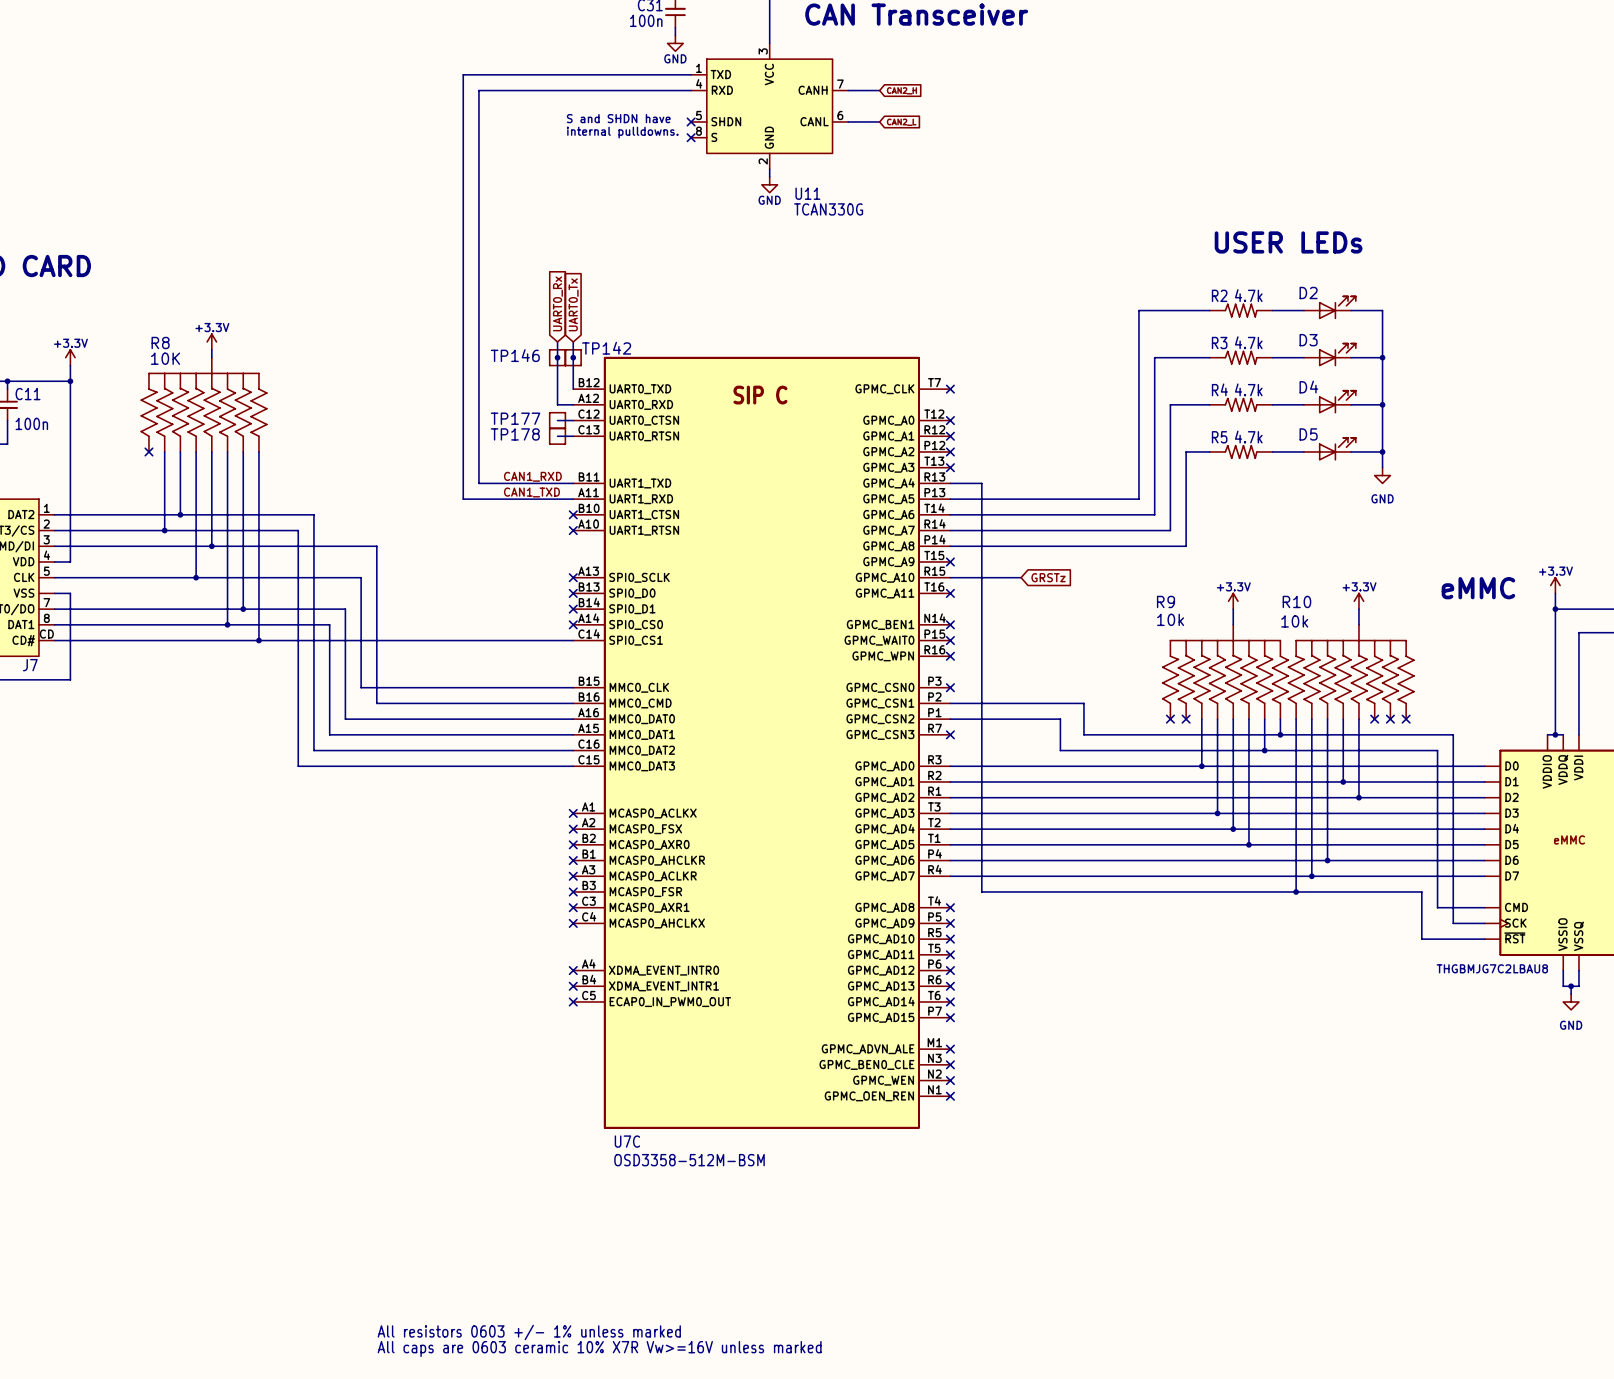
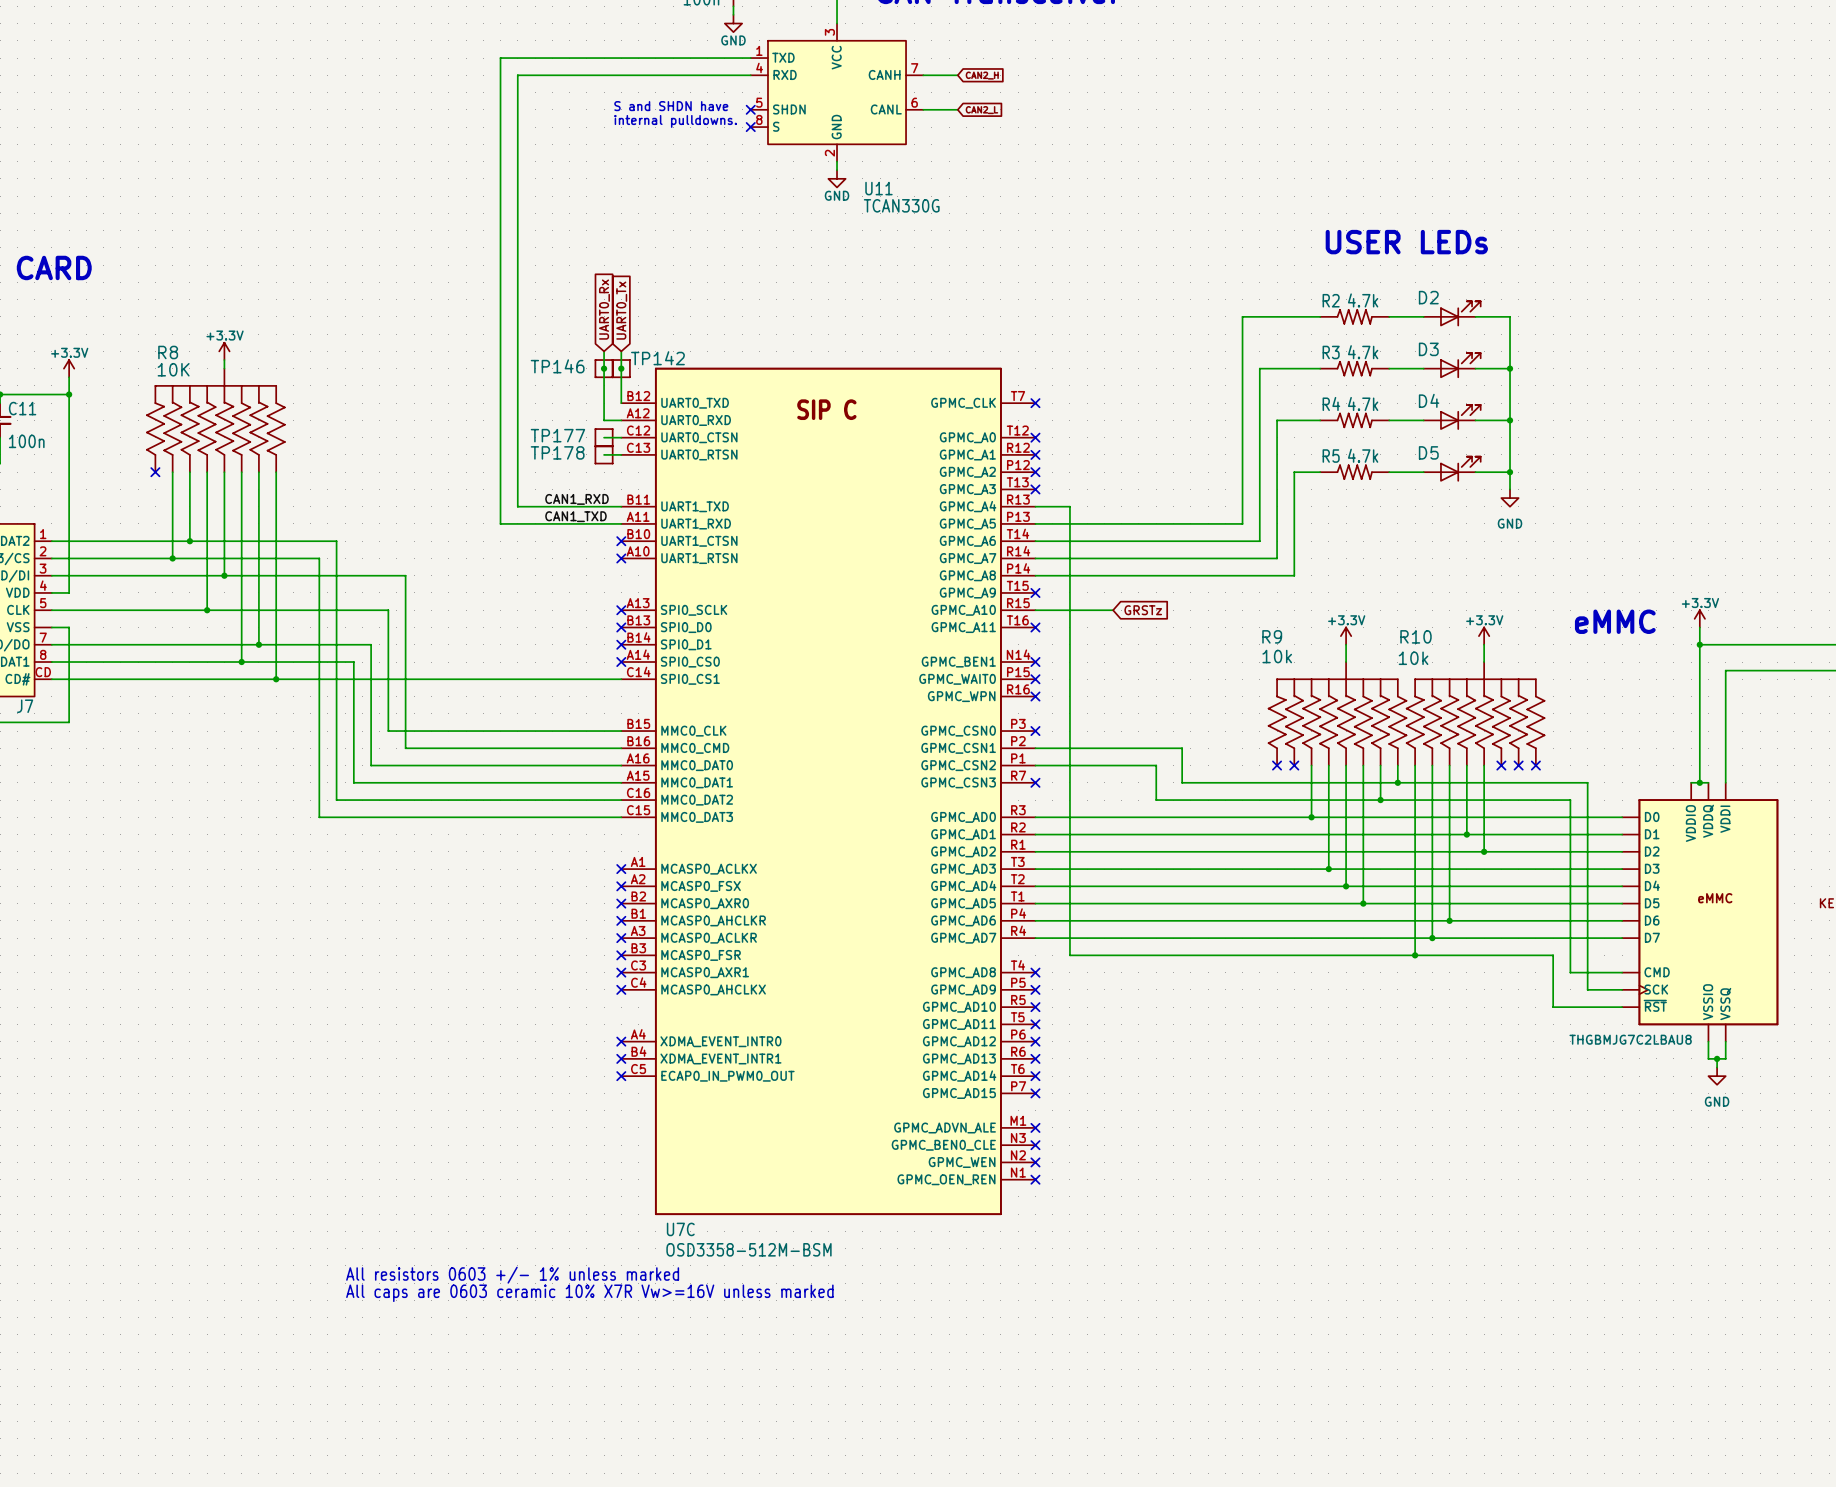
text: none -> All resistors 0603 +/- 1% unless marked (512, 1275)
text: none -> All caps are 0603 ceramic 10% X7R Vw>=16V unless marked (589, 1293)
text: All resistors 0603 +/- 1% unless marked (529, 1332) -> none
text: All caps are 0603 ceramic 10% X7R Vw>=16V unless marked (599, 1349) -> none

